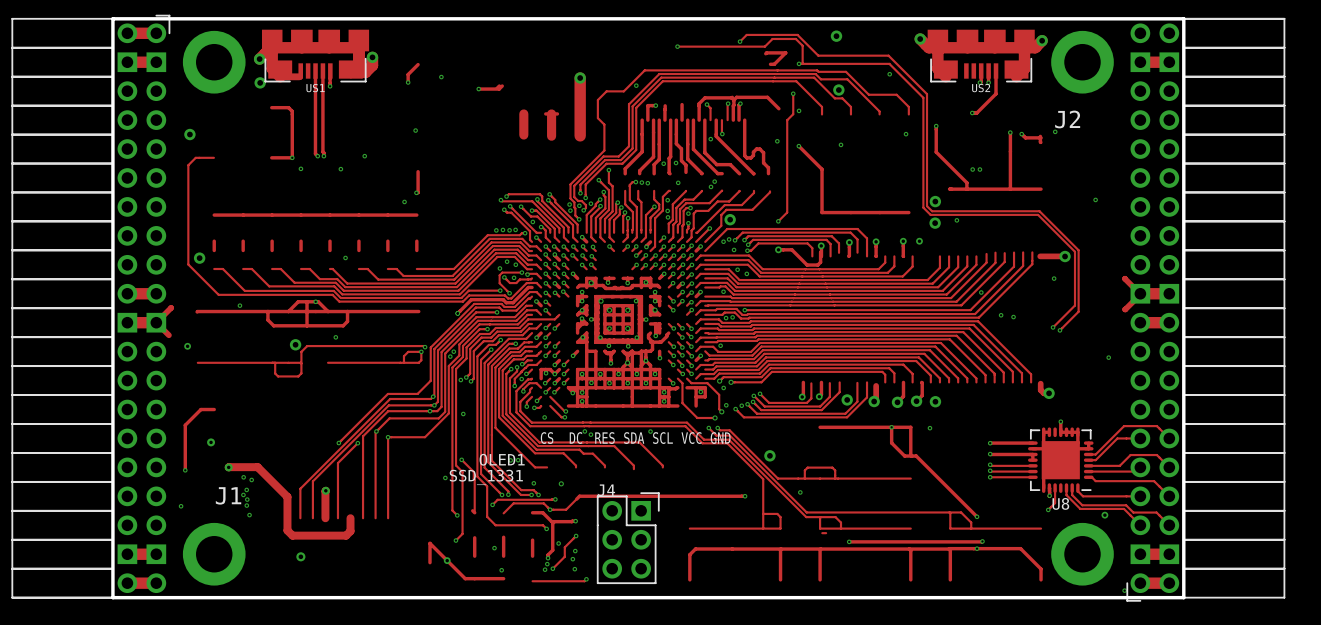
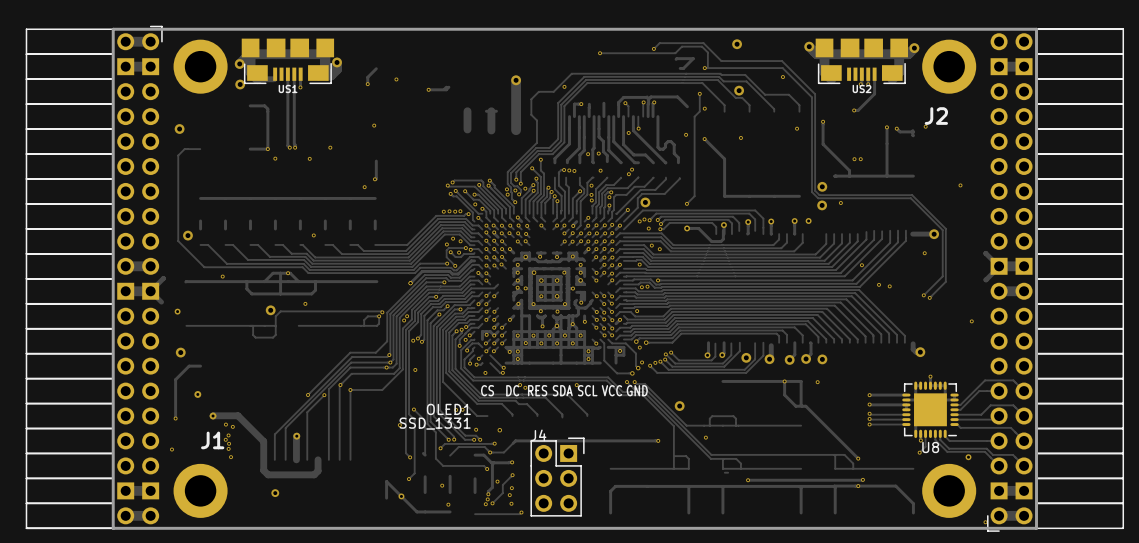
via: none -> (180, 352)

